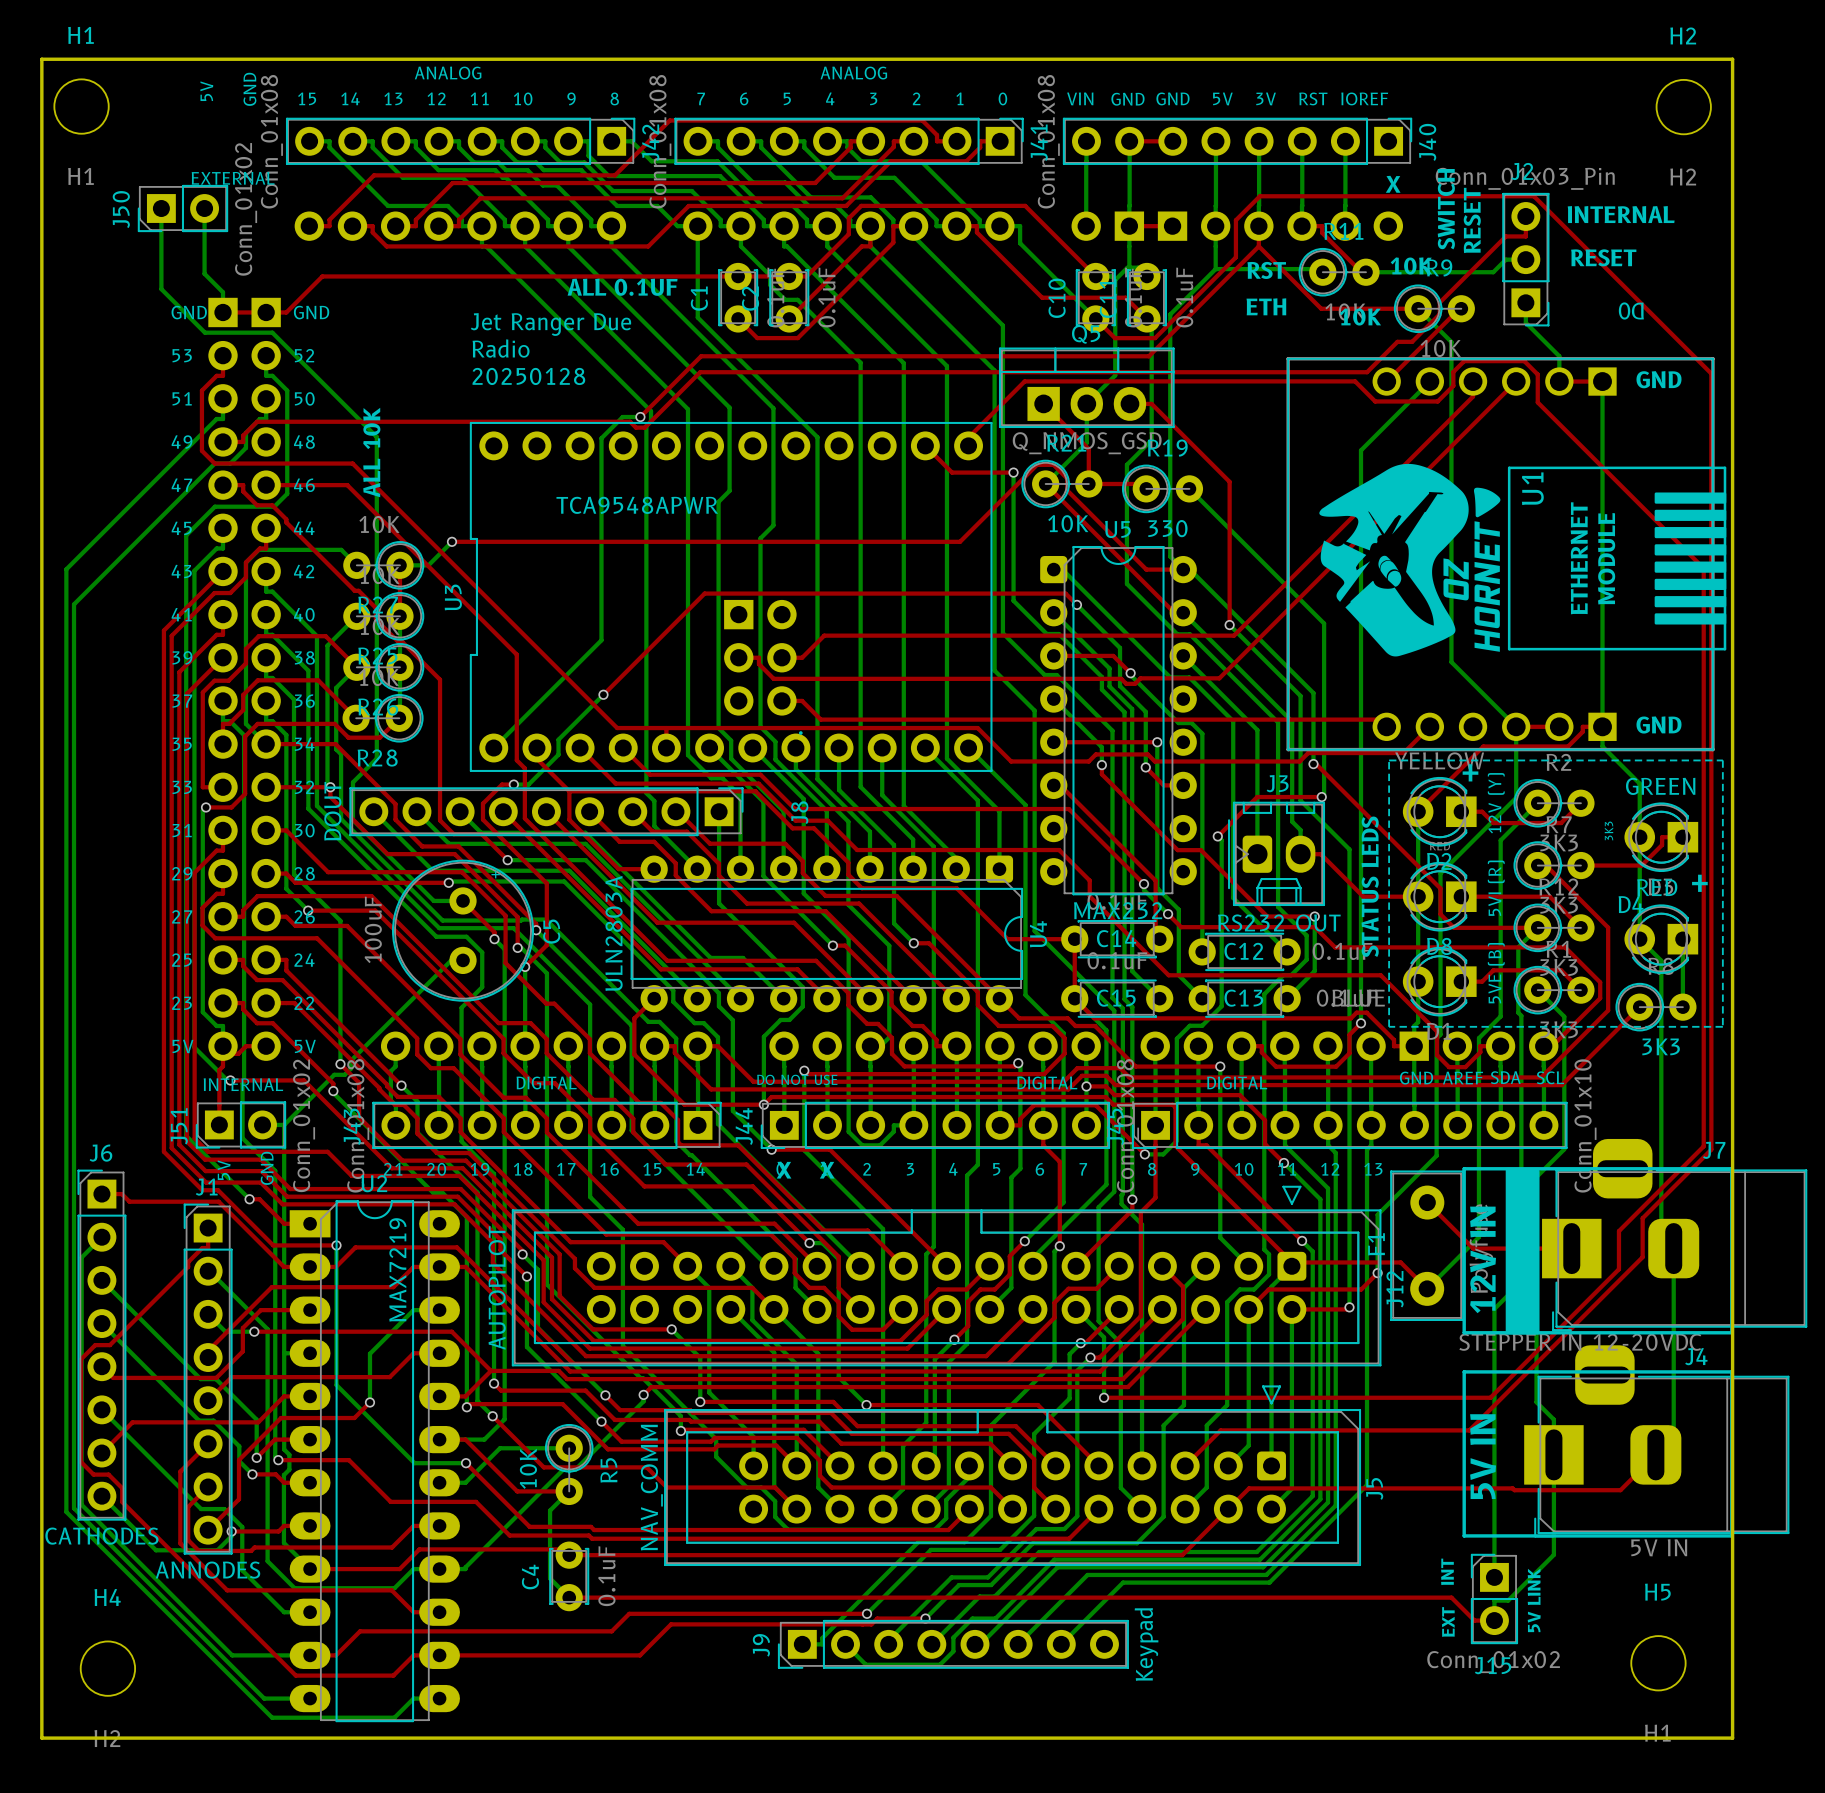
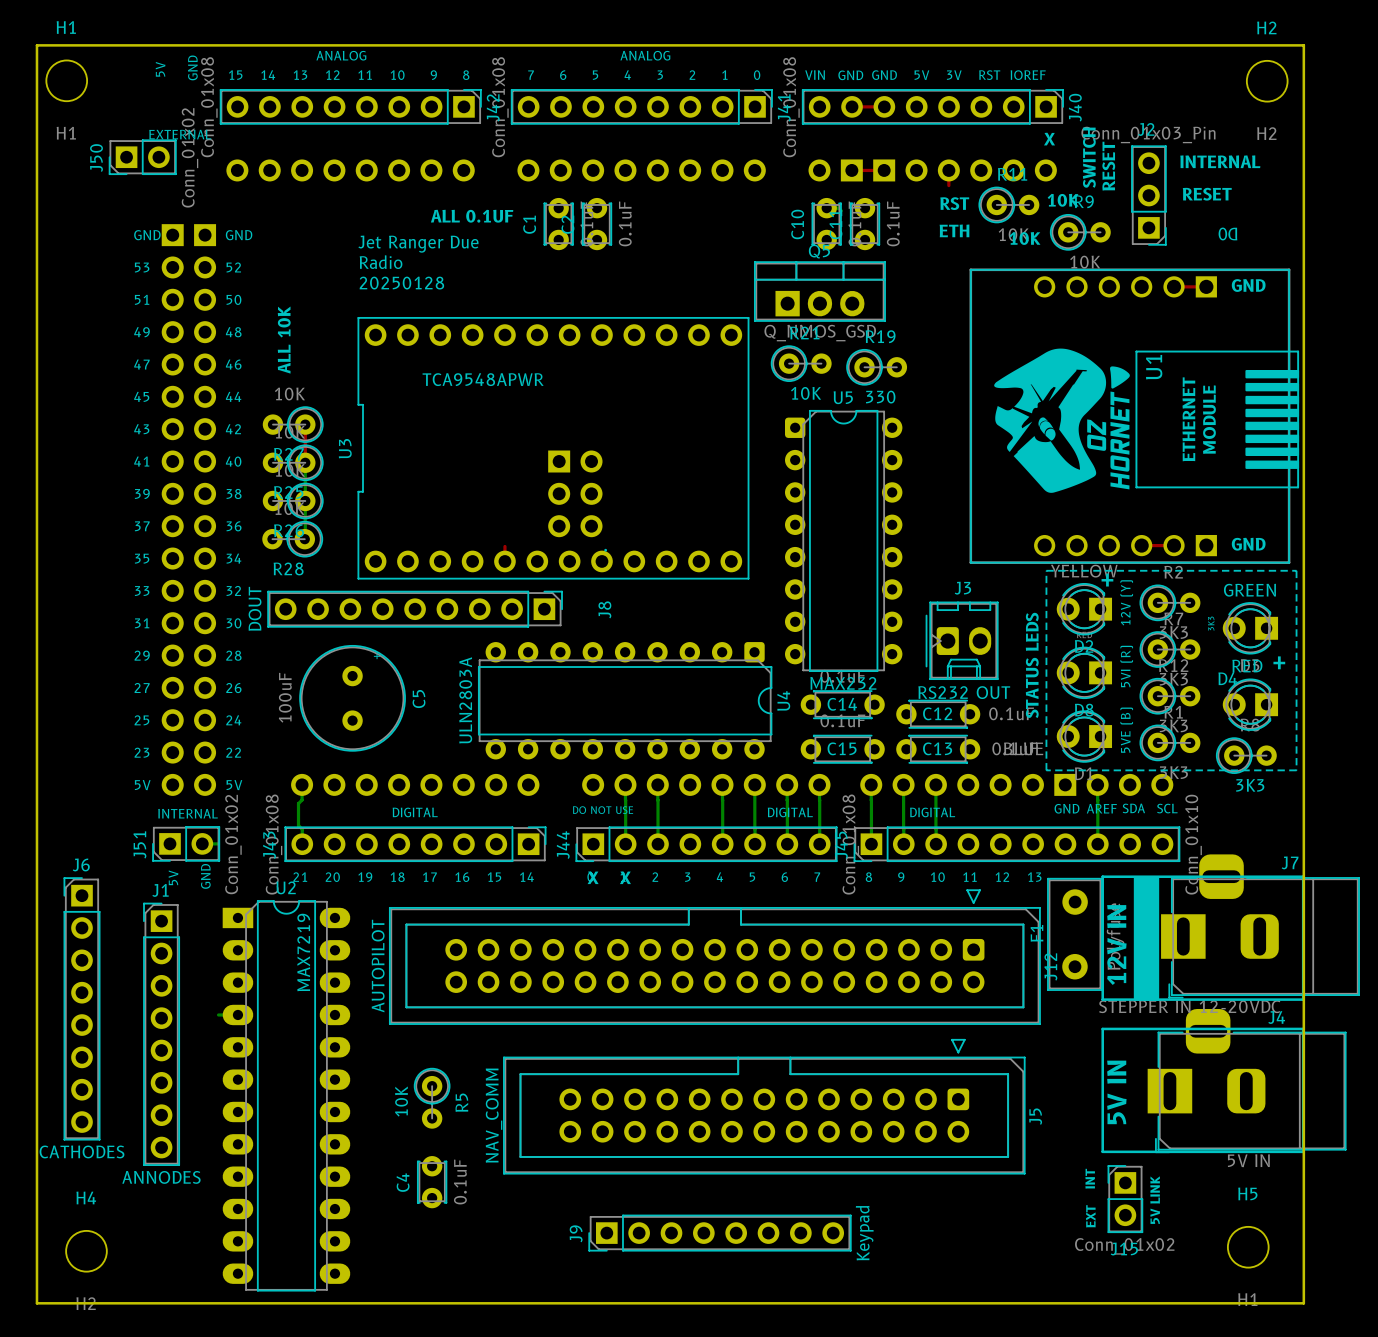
bottom track: (309, 141) (329, 141) (329, 147) (387, 205) (447, 205) (461, 219) (461, 226) (481, 226) (481, 246) (486, 246) (651, 411) (651, 421) (646, 426) (646, 793) (654, 801) (654, 826) (697, 869) -> none
bottom track: (352, 141) (372, 141) (372, 147) (403, 177) (462, 177) (504, 219) (504, 226) (525, 226) (525, 246) (688, 409) (688, 755) (711, 778) (722, 778) (740, 796) (740, 869) -> none
bottom track: (395, 141) (415, 141) (415, 147) (438, 170) (495, 170) (502, 177) (506, 177) (548, 219) (548, 226) (568, 226) (568, 246) (729, 407) (729, 490) (718, 501) (718, 728) (731, 740) (731, 758) (783, 811) (783, 869) -> none
bottom track: (439, 141) (459, 141) (459, 147) (474, 162) (498, 162) (506, 170) (527, 170) (542, 185) (556, 185) (591, 219) (591, 226) (611, 226) (611, 246) (773, 408) (773, 525) (760, 538) (760, 726) (775, 741) (775, 759) (826, 810) (826, 869) -> none
bottom track: (482, 141) (502, 141) (502, 147) (517, 162) (536, 162) (543, 170) (581, 170) (617, 205) (657, 205) (677, 226) (697, 226) (697, 317) (817, 437) (817, 779) (869, 831) (869, 869) -> none
bottom track: (525, 141) (545, 141) (545, 147) (560, 162) (584, 162) (612, 191) (691, 191) (720, 219) (720, 226) (740, 226) (740, 246) (770, 275) (770, 284) (785, 299) (797, 299) (860, 362) (860, 786) (913, 839) (913, 869) -> none
bottom track: (568, 141) (588, 141) (588, 155) (608, 176) (720, 176) (763, 219) (763, 226) (784, 226) (784, 246) (786, 246) (903, 363) (903, 805) (956, 858) (956, 869) -> none
bottom track: (611, 141) (631, 141) (651, 161) (717, 161) (762, 205) (793, 205) (807, 219) (807, 226) (827, 226) (827, 246) (946, 366) (946, 758) (999, 811) (999, 869) -> none
bottom track: (698, 141) (717, 141) (717, 147) (752, 182) (785, 182) (808, 205) (836, 205) (850, 219) (850, 226) (870, 226) (870, 246) (994, 370) (994, 670) (1034, 710) (1034, 931) (1114, 1010) (1114, 1191) (1098, 1207) (1098, 1321) (1120, 1343) (1120, 1487) (1142, 1509) -> none
bottom track: (741, 141) (761, 141) (761, 147) (810, 197) (870, 197) (893, 219) (893, 226) (913, 226) -> none
bottom track: (784, 141) (804, 141) (804, 147) (834, 177) (894, 177) (936, 219) (936, 226) (956, 226) -> none
bottom track: (827, 141) (847, 141) (847, 147) (861, 161) (921, 161) (979, 219) (979, 226) (1020, 226) (1020, 243) (1095, 318) -> none
top track: (870, 141) (850, 141) (850, 147) (815, 183) (452, 183) (415, 219) (415, 226) (395, 226) -> none
top track: (913, 141) (893, 141) (893, 146) (842, 198) (480, 198) (459, 219) (459, 226) (438, 226) -> none
top track: (956, 141) (937, 141) (937, 135) (922, 120) (669, 120) (614, 175) (374, 175) (329, 219) (329, 226) (309, 226) -> none
top track: (1000, 141) (980, 141) (980, 147) (966, 161) (890, 161) (846, 205) (688, 205) (648, 246) (386, 246) (372, 232) (372, 226) (352, 226) -> none
bottom track: (1086, 141) (1086, 226) -> none
bottom track: (1129, 141) (1129, 267) -> none
bottom track: (1215, 141) (1215, 269) -> none
bottom track: (1259, 141) (1258, 226) -> none
bottom track: (1302, 141) (1302, 226) -> none
bottom track: (1345, 141) (1345, 226) -> none
bottom track: (161, 208) (161, 289) (204, 332) (272, 332) (376, 437) (376, 758) (352, 782) (352, 820) (433, 900) (463, 900) -> none
bottom track: (204, 208) (204, 273) (223, 292) (223, 312) -> none
top track: (1525, 216) (1525, 236) (1505, 236) (1439, 302) (1439, 314) (1412, 341) (1397, 341) (1367, 372) (700, 372) (644, 427) (636, 427) (630, 421) (257, 421) (243, 435) (243, 441) (223, 441) -> none
top track: (870, 226) (870, 246) (861, 246) (789, 318) -> none
bottom track: (903, 226) (1002, 325) (1002, 633) (1044, 675) (1056, 675) (1112, 730) (1112, 998) (1122, 1008) (1121, 1204) (1142, 1224) (1142, 1465) -> none
top track: (913, 226) (893, 226) (893, 242) (797, 338) (757, 338) (738, 318) -> none
top track: (956, 226) (976, 226) (976, 232) (1042, 297) (1125, 297) (1146, 318) -> none
top track: (1302, 226) (1322, 226) (1322, 232) (1361, 272) (1365, 272) -> none
bottom track: (1525, 259) (1505, 259) (1493, 272) (1365, 272) -> none
bottom track: (1215, 269) (1170, 314) (1170, 556) (1183, 569) (1189, 569) (1313, 693) (1313, 764) -> none
bottom track: (1215, 269) (1319, 269) (1322, 272) -> none
top track: (1095, 276) (1025, 205) (861, 205) (848, 218) (848, 234) (806, 276) (322, 276) (286, 312) (223, 312) -> none
bottom track: (1146, 276) (1138, 267) (1127, 267) (1115, 279) (1115, 375) (1086, 403) (1086, 442) (1045, 483) -> none
bottom track: (1525, 302) (1525, 322) (1559, 356) (1559, 381) -> none
top track: (1418, 308) (1321, 308) (1258, 246) (1148, 356) (701, 356) (640, 417) -> none
bottom track: (1418, 308) (1451, 342) (1451, 662) (1516, 726) (1516, 797) (1440, 873) (1440, 1034) (1436, 1038) (1436, 1155) (1377, 1214) (1377, 1273) -> none
top track: (1461, 308) (1386, 381) -> none
top track: (1095, 318) (1115, 338) (1155, 338) (1235, 257) (1235, 220) (1259, 196) (1533, 196) (1711, 373) (1711, 1149) (1642, 1218) (1642, 1257) (1469, 1430) (1220, 1430) (1185, 1465) -> none
bottom track: (1146, 318) (1151, 323) (1151, 440) (1126, 464) (1126, 583) (1177, 634) (1189, 634) (1278, 722) (1278, 907) (1306, 935) (1306, 959) (1291, 975) (1283, 975) (1264, 994) (1264, 1249) (1269, 1254) (1269, 1274) (1254, 1289) (1239, 1289) (1227, 1302) (1227, 1405) (1206, 1425) (1206, 1487) (1185, 1509) -> none
top track: (223, 355) (223, 375) (216, 375) (201, 390) (201, 450) (214, 463) (352, 463) (617, 728) (977, 728) (1011, 761) (1088, 761) (1095, 754) (1147, 754) (1154, 761) (1299, 761) (1308, 753) (1403, 753) (1429, 726) -> none
bottom track: (266, 355) (266, 375) (272, 375) (287, 390) (287, 493) (274, 506) (214, 506) (186, 535) (186, 1135) (249, 1199) -> none
bottom track: (1429, 381) (1361, 450) (1361, 1023) -> none
top track: (1473, 381) (1473, 396) (1234, 635) (824, 635) (802, 657) (781, 657) -> none
top track: (1516, 381) (1219, 678) (1140, 678) (1135, 683) (1126, 683) (1121, 678) (773, 678) (758, 664) (758, 657) (738, 657) -> none
bottom track: (1602, 381) (1602, 746) (1639, 783) (1639, 939) (1661, 960) (1661, 1236) (1673, 1248) (1673, 1437) (1655, 1454) -> none
bottom track: (223, 398) (223, 419) (216, 419) (66, 569) (66, 1511) (272, 1717) (394, 1717) (413, 1698) (439, 1698) -> none
bottom track: (266, 398) (266, 419) (259, 419) (245, 432) (245, 447) (230, 463) (214, 463) (74, 604) (74, 1508) (264, 1698) (310, 1698) -> none
top track: (1043, 403) (1088, 449) (1088, 483) (1141, 483) (1146, 488) -> none
top track: (1129, 403) (1151, 403) (1229, 481) (1229, 625) -> none
bottom track: (640, 417) (622, 417) (601, 438) (601, 640) (493, 748) -> none
via: (640, 417) -> none
top track: (925, 445) (952, 472) (1013, 472) -> none
top track: (968, 445) (968, 437) (1024, 381) (1355, 381) (1375, 401) (1437, 401) (1453, 385) (1453, 372) (1464, 361) (1524, 361) (1537, 374) (1537, 402) (1703, 568) (1703, 1146) (1618, 1231) (1618, 1269) (1490, 1397) (1104, 1397) -> none
bottom track: (1013, 472) (1013, 600) (1046, 634) (1058, 634) (1101, 676) (1101, 689) (1124, 712) (1124, 999) (1132, 1007) (1132, 1199) -> none
via: (1013, 472) -> none
top track: (1045, 483) (1174, 612) (1183, 612) -> none
top track: (223, 485) (243, 485) (243, 491) (257, 505) (272, 505) (286, 519) (286, 522) (354, 590) (358, 590) (375, 608) (375, 619) (398, 641) (402, 641) (440, 679) (440, 820) (453, 834) (481, 834) (507, 860) -> none
top track: (266, 485) (347, 485) (516, 654) (516, 760) (524, 768) (524, 818) (667, 960) (816, 960) (848, 993) (848, 1005) (867, 1023) (877, 1023) (891, 1037) (891, 1053) (904, 1066) (1015, 1066) (1018, 1063) -> none
bottom track: (1189, 488) (1324, 623) (1324, 794) (1321, 797) -> none
bottom track: (223, 528) (223, 548) (216, 548) (194, 570) (194, 1047) (227, 1080) (230, 1080) -> none
top track: (266, 528) (266, 548) (259, 548) (245, 562) (245, 577) (230, 593) (214, 593) (171, 635) (171, 1148) (206, 1182) (260, 1182) (282, 1204) (454, 1204) (492, 1242) (492, 1262) (586, 1356) (986, 1356) (1032, 1309) -> none
top track: (452, 541) (960, 541) (1037, 464) (1053, 464) (1067, 478) (1067, 490) (1146, 569) (1183, 569) -> none
bottom track: (452, 541) (428, 565) (399, 565) -> none
via: (452, 541) -> none
bottom track: (356, 565) (341, 549) (258, 549) (245, 562) (245, 723) (266, 744) -> none
bottom track: (1053, 569) (1062, 569) (1170, 677) (1189, 677) (1233, 721) (1233, 897) (1287, 951) -> none
top track: (223, 571) (163, 630) (163, 1151) (202, 1190) (218, 1190) (273, 1245) (336, 1245) -> none
bottom track: (266, 571) (266, 591) (272, 591) (316, 636) (316, 805) (439, 928) (513, 928) (590, 1004) (590, 1196) (622, 1229) (622, 1345) (716, 1439) (716, 1456) (746, 1487) (761, 1487) (775, 1501) (775, 1516) (787, 1529) (934, 1529) (946, 1518) (946, 1500) (969, 1476) (969, 1465) -> none
top track: (1076, 604) (1065, 593) (704, 593) (603, 694) -> none
bottom track: (1076, 604) (1120, 647) (1120, 686) (1145, 711) (1145, 767) -> none
via: (1076, 604) -> none
bottom track: (1053, 612) (1109, 668) (1109, 686) (1132, 709) (1132, 971) (1159, 998) -> none
bottom track: (1183, 612) (1292, 721) (1292, 821) (1300, 830) (1300, 854) -> none
top track: (223, 614) (223, 634) (216, 634) (179, 672) (179, 1144) (205, 1171) (261, 1171) (287, 1196) (457, 1196) (500, 1239) (500, 1250) (526, 1276) -> none
bottom track: (266, 614) (266, 634) (272, 634) (308, 670) (308, 808) (436, 936) (466, 936) (482, 952) (482, 987) (461, 1007) (461, 1141) (494, 1173) (494, 1383) -> none
bottom track: (356, 616) (327, 645) (327, 784) (330, 787) -> none
bottom track: (1229, 625) (1300, 695) (1300, 800) (1349, 849) (1349, 1307) -> none
via: (1229, 625) -> none
top track: (1053, 655) (1113, 655) (1130, 673) -> none
bottom track: (1183, 655) (1257, 730) (1257, 854) -> none
top track: (223, 657) (186, 693) (186, 1141) (205, 1159) (260, 1159) (290, 1189) (460, 1189) (522, 1250) (522, 1254) -> none
bottom track: (266, 657) (266, 677) (272, 677) (294, 699) (294, 874) (340, 920) (340, 1064) -> none
top track: (356, 667) (325, 636) (258, 636) (245, 649) (245, 663) (228, 680) (214, 680) (202, 692) (202, 787) (223, 787) -> none
bottom track: (356, 667) (336, 687) (336, 749) (341, 754) (341, 818) (442, 920) (546, 919) (648, 1021) (659, 1021) (676, 1038) (676, 1141) (795, 1258) (795, 1287) (817, 1309) -> none
bottom track: (1130, 673) (1178, 723) (1191, 723) (1202, 733) (1202, 951) -> none
via: (1130, 673) -> none
bottom track: (603, 694) (558, 739) (558, 754) (528, 784) (513, 784) -> none
via: (603, 694) -> none
bottom track: (1053, 699) (1101, 747) (1101, 765) -> none
bottom track: (223, 700) (223, 721) (230, 721) (244, 735) (242, 1138) (275, 1170) (275, 1457) (278, 1460) -> none
bottom track: (266, 700) (266, 721) (272, 721) (286, 735) (286, 888) (308, 910) -> none
top track: (781, 700) (802, 700) (820, 719) (1379, 719) (1386, 726) -> none
top track: (356, 718) (318, 680) (257, 680) (243, 694) (243, 710) (229, 723) (223, 723) (223, 744) -> none
top track: (399, 718) (379, 737) (348, 737) (334, 723) (257, 723) (245, 736) (245, 793) (231, 807) (206, 807) -> none
top track: (1602, 726) (1582, 726) (1582, 731) (1568, 746) (1483, 746) (1418, 811) -> none
top track: (1053, 742) (1157, 742) -> none
bottom track: (1157, 742) (1157, 888) (1178, 909) (1178, 975) (1202, 998) -> none
via: (1157, 742) -> none
top track: (266, 744) (335, 744) (395, 804) (395, 819) (422, 846) (458, 846) (536, 924) (536, 930) -> none
top track: (536, 748) (536, 758) (569, 791) -> none
top track: (580, 748) (615, 783) (758, 783) (795, 820) (827, 820) (857, 850) (1059, 850) (1089, 880) (1089, 896) (1168, 975) (1380, 975) (1437, 1031) (1437, 1055) (1449, 1067) (1465, 1067) (1480, 1052) (1480, 1046) (1500, 1046) -> none
top track: (623, 748) (649, 774) (760, 774) (794, 809) (1068, 809) (1144, 884) -> none
bottom track: (709, 748) (763, 801) (763, 876) (832, 945) -> none
bottom track: (752, 748) (803, 799) (803, 893) (848, 938) (848, 1131) (862, 1145) (880, 1145) (893, 1131) (893, 1125) (913, 1125) (913, 1046) -> none
bottom track: (795, 748) (795, 769) (848, 821) (848, 904) (889, 945) (889, 1037) (870, 1056) -> none
bottom track: (839, 748) (839, 790) (894, 845) (894, 923) (913, 943) -> none
bottom track: (882, 748) (882, 795) (933, 846) (933, 1246) (926, 1254) (926, 1422) (903, 1445) (903, 1489) (883, 1509) -> none
bottom track: (925, 748) (977, 800) (977, 1164) (967, 1175) (967, 1343) (948, 1362) (948, 1486) (926, 1509) -> none
bottom track: (968, 748) (1025, 804) (1025, 995) (1063, 1033) (1063, 1202) (1024, 1241) -> none
top track: (1313, 764) (1316, 764) (1440, 888) (1440, 914) (1454, 927) (1537, 927) -> none
via: (1313, 764) -> none
top track: (1101, 765) (1101, 774) (1177, 850) (1200, 850) (1267, 916) (1314, 916) -> none
via: (1101, 765) -> none
top track: (1145, 767) (1163, 785) (1183, 785) -> none
via: (1145, 767) -> none
top track: (513, 784) (502, 784) (482, 803) (482, 819) (546, 883) (546, 945) (525, 966) -> none
via: (513, 784) -> none
top track: (1053, 785) (1060, 785) (1155, 880) (1155, 935) (1159, 939) -> none
top track: (266, 787) (330, 787) (330, 796) (387, 854) (454, 854) (517, 917) (517, 947) -> none
via: (330, 787) -> none
top track: (569, 791) (755, 791) (792, 828) (814, 828) (848, 862) (848, 874) (861, 888) (956, 888) (1007, 939) (1074, 939) (1074, 998) (1094, 1018) (1350, 1018) (1356, 1012) (1366, 1012) (1394, 1039) (1394, 1046) (1414, 1046) -> none
top track: (569, 791) (569, 819) (618, 869) (654, 869) -> none
top track: (1321, 797) (1257, 797) (1217, 836) -> none
via: (1321, 797) -> none
bottom track: (1537, 803) (1500, 840) (1500, 1016) (1478, 1038) (1478, 1237) (1427, 1288) -> none
top track: (1580, 803) (1561, 823) (1493, 823) (1482, 811) (1461, 811) -> none
bottom track: (206, 807) (202, 810) (202, 1012) (216, 1026) (223, 1026) (223, 1046) -> none
via: (206, 807) -> none
bottom track: (373, 811) (432, 870) (569, 870) (697, 998) -> none
bottom track: (416, 811) (449, 843) (585, 843) (740, 998) -> none
bottom track: (460, 811) (481, 832) (585, 832) (710, 957) (742, 957) (783, 998) -> none
top track: (503, 811) (660, 969) (797, 969) (826, 998) -> none
top track: (546, 811) (657, 922) (794, 922) (869, 998) -> none
top track: (589, 811) (619, 841) (654, 841) (675, 863) (675, 875) (711, 911) (825, 911) (913, 998) -> none
top track: (632, 811) (652, 831) (686, 831) (718, 863) (718, 875) (747, 903) (859, 903) (956, 998) -> none
top track: (675, 811) (709, 843) (785, 843) (802, 861) (802, 873) (825, 895) (896, 895) (1019, 1018) (1067, 1018) (1075, 1026) (1095, 1026) (1135, 1066) (1220, 1066) -> none
bottom track: (719, 811) (719, 903) (802, 987) (802, 1006) (789, 1019) (780, 1019) (763, 1036) (763, 1104) -> none
bottom track: (1418, 811) (1418, 1022) (1414, 1026) (1414, 1125) -> none
top track: (223, 830) (223, 850) (216, 850) (194, 872) (194, 1138) (208, 1151) (327, 1151) (351, 1175) (459, 1175) (543, 1260) (543, 1302) (589, 1348) (907, 1348) (946, 1309) -> none
top track: (266, 830) (286, 830) (328, 872) (462, 872) (505, 915) (505, 963) (546, 1003) (554, 1003) (589, 1039) (589, 1053) (639, 1102) (660, 1102) (678, 1120) (678, 1142) (681, 1145) (738, 1145) (823, 1230) (867, 1230) (903, 1266) -> none
bottom track: (1217, 836) (1221, 840) (1221, 1006) (1202, 1025) (1189, 1025) (1176, 1038) (1176, 1140) (1163, 1154) (1144, 1154) -> none
via: (1217, 836) -> none
top track: (1682, 837) (1662, 837) (1662, 845) (1641, 865) (1580, 865) -> none
top track: (1300, 854) (1320, 854) (1363, 896) (1418, 896) -> none
bottom track: (507, 860) (585, 860) (718, 993) (718, 1006) (732, 1020) (732, 1110) (771, 1149) -> none
via: (507, 860) -> none
top track: (1537, 865) (1546, 865) (1608, 927) (1608, 1010) (1541, 1077) (1129, 1077) (1120, 1068) (1077, 1068) (1063, 1081) (753, 1081) (717, 1046) (697, 1046) -> none
top track: (223, 873) (223, 893) (216, 893) (202, 907) (202, 925) (215, 938) (317, 938) (417, 1038) (417, 1054) (430, 1068) (453, 1068) (503, 1118) (503, 1132) (606, 1234) (770, 1234) (794, 1258) (794, 1273) (809, 1287) (824, 1287) (838, 1302) (838, 1316) (852, 1329) (883, 1329) (903, 1309) -> none
top track: (266, 873) (286, 873) (295, 882) (448, 882) -> none
bottom track: (448, 882) (564, 881) (673, 990) (673, 1001) (694, 1023) (703, 1023) (717, 1037) (717, 1123) (860, 1266) -> none
via: (448, 882) -> none
bottom track: (1144, 884) (1144, 890) (1168, 914) -> none
via: (1144, 884) -> none
top track: (1461, 896) (1549, 896) (1580, 927) -> none
top track: (463, 900) (494, 932) (494, 939) -> none
top track: (308, 910) (375, 910) (503, 1038) (503, 1053) (533, 1083) (554, 1083) (590, 1118) (590, 1132) (644, 1186) (752, 1186) (809, 1243) -> none
via: (308, 910) -> none
top track: (1168, 914) (1181, 927) (1314, 927) (1335, 947) (1565, 947) (1600, 982) (1600, 998) (1552, 1046) (1543, 1046) -> none
via: (1168, 914) -> none
top track: (223, 916) (243, 916) (243, 910) (257, 896) (371, 896) (498, 1023) (530, 1023) (546, 1039) (546, 1053) (593, 1099) (614, 1099) (633, 1118) (633, 1132) (665, 1164) (746, 1164) (838, 1256) (838, 1287) (860, 1309) -> none
top track: (266, 916) (286, 916) (295, 925) (347, 925) (460, 1039) (460, 1054) (503, 1097) (526, 1097) (546, 1118) (546, 1132) (638, 1223) (774, 1223) (817, 1266) -> none
bottom track: (1314, 916) (1314, 971) (1287, 998) -> none
via: (1314, 916) -> none
bottom track: (1537, 927) (1518, 947) (1518, 1012) (1521, 1015) (1521, 1282) (1494, 1308) (1494, 1577) -> none
bottom track: (536, 930) (631, 1025) (631, 1130) (767, 1266) (773, 1266) -> none
via: (536, 930) -> none
bottom track: (494, 939) (504, 949) (504, 1419) (484, 1439) (439, 1439) -> none
via: (494, 939) -> none
bottom track: (1682, 939) (1682, 1007) -> none
top track: (913, 943) (928, 943) (977, 992) (977, 1005) (998, 1026) (1052, 1026) (1064, 1038) (1064, 1053) (1044, 1074) (807, 1074) (804, 1070) -> none
via: (913, 943) -> none
top track: (832, 945) (845, 945) (891, 992) (891, 1004) (912, 1026) (922, 1026) (936, 1039) (936, 1046) (956, 1046) -> none
via: (832, 945) -> none
bottom track: (517, 947) (521, 947) (546, 973) (546, 1284) (680, 1416) (680, 1430) -> none
via: (517, 947) -> none
top track: (223, 959) (243, 959) (243, 966) (257, 980) (282, 980) (397, 1096) (438, 1096) (460, 1118) (460, 1132) (570, 1242) (663, 1242) (687, 1266) -> none
top track: (266, 959) (286, 959) (286, 970) (401, 1085) -> none
bottom track: (463, 960) (451, 960) (351, 1060) (351, 1068) (344, 1074) (334, 1074) (284, 1124) (284, 1449) (289, 1454) (289, 1469) (283, 1475) (283, 1542) (310, 1569) -> none
bottom track: (525, 966) (525, 1125) -> none
via: (525, 966) -> none
top track: (1461, 981) (1482, 981) (1493, 970) (1561, 970) (1580, 990) -> none
bottom track: (1537, 990) (1564, 1016) (1564, 1149) (1536, 1177) (1536, 1402) (1553, 1419) (1553, 1554) (1508, 1600) (1494, 1600) (1494, 1620) -> none
top track: (654, 998) (634, 1018) (634, 1054) (684, 1104) (763, 1104) (771, 1097) (1105, 1097) (1113, 1104) (1172, 1104) (1175, 1107) (1175, 1146) (1291, 1262) -> none
bottom track: (1074, 998) (1106, 1030) (1106, 1184) (1032, 1258) (1032, 1266) -> none
top track: (223, 1003) (243, 1003) (243, 1009) (257, 1023) (272, 1023) (333, 1083) (333, 1091) -> none
top track: (266, 1003) (294, 1003) (395, 1104) (403, 1104) (417, 1118) (417, 1133) (436, 1153) (469, 1153) (574, 1258) (574, 1268) (594, 1287) (752, 1287) (773, 1309) -> none
top track: (1639, 1007) (1561, 1085) (1115, 1085) (1106, 1075) (1082, 1075) (1068, 1089) (711, 1089) (674, 1053) (674, 1046) (654, 1046) -> none
top track: (1361, 1023) (1349, 1034) (1349, 1053) (1336, 1066) (1275, 1066) (1261, 1052) (1261, 1046) (1241, 1046) -> none
via: (1361, 1023) -> none
top track: (223, 1046) (223, 1066) (219, 1070) (219, 1124) -> none
top track: (266, 1046) (245, 1046) (238, 1053) (223, 1053) -> none
bottom track: (438, 1046) (439, 1125) -> none
bottom track: (481, 1046) (482, 1125) -> none
bottom track: (568, 1046) (568, 1125) -> none
bottom track: (611, 1046) (611, 1125) -> none
bottom track: (654, 1046) (654, 1125) -> none
bottom track: (697, 1046) (698, 1125) -> none
bottom track: (784, 1046) (784, 1125) -> none
bottom track: (1284, 1046) (1285, 1145) (1328, 1188) (1328, 1502) (1263, 1567) (1057, 1567) (980, 1644) (975, 1644) -> none
bottom track: (1327, 1046) (1328, 1145) (1335, 1152) (1335, 1505) (1266, 1574) (1087, 1574) (1018, 1644) -> none
bottom track: (1371, 1046) (1371, 1145) (1367, 1149) (1367, 1485) (1269, 1582) (1123, 1582) (1061, 1644) -> none
bottom track: (1500, 1046) (1500, 1125) -> none
bottom track: (1543, 1046) (1543, 1125) -> none
bottom track: (1018, 1063) (1020, 1065) (1020, 1168) (1011, 1177) (1011, 1287) (989, 1309) -> none
via: (1018, 1063) -> none
top track: (340, 1064) (359, 1082) (359, 1117) (402, 1160) (465, 1160) (559, 1254) (559, 1296) (593, 1329) (671, 1329) -> none
via: (340, 1064) -> none
bottom track: (1220, 1066) (1220, 1237) (1248, 1266) -> none
via: (1220, 1066) -> none
bottom track: (804, 1070) (804, 1150) (883, 1229) (883, 1465) -> none
via: (804, 1070) -> none
top track: (230, 1080) (303, 1080) (391, 1168) (462, 1168) (552, 1257) (552, 1299) (593, 1340) (900, 1340) (926, 1314) (926, 1301) (938, 1289) (966, 1289) (989, 1266) -> none
via: (230, 1080) -> none
bottom track: (401, 1085) (417, 1101) (417, 1132) (477, 1192) (477, 1401) (492, 1416) -> none
via: (401, 1085) -> none
top track: (1086, 1086) (1105, 1086) (1114, 1095) (1239, 1095) (1265, 1120) (1265, 1144) (1284, 1163) -> none
via: (1086, 1086) -> none
bottom track: (333, 1091) (433, 1193) (442, 1193) (466, 1217) (466, 1407) -> none
via: (333, 1091) -> none
via: (763, 1104) -> none
top track: (1000, 1125) (1020, 1125) (1020, 1119) (1033, 1105) (1095, 1105) (1144, 1154) -> none
top track: (1043, 1125) (1043, 1145) (1059, 1161) (1059, 1246) -> none
top track: (1155, 1125) (1155, 1197) (1140, 1212) (1140, 1316) (1099, 1357) (1090, 1357) -> none
top track: (1198, 1125) (1198, 1145) (1206, 1145) (1302, 1240) -> none
top track: (771, 1149) (830, 1149) (946, 1266) -> none
via: (771, 1149) -> none
via: (1144, 1154) -> none
bottom track: (1284, 1163) (1320, 1199) (1320, 1499) (1260, 1559) (1054, 1559) (995, 1618) (972, 1618) (953, 1637) (953, 1651) (940, 1664) (865, 1664) (845, 1644) -> none
via: (1284, 1163) -> none
top track: (101, 1194) (121, 1194) (129, 1201) (218, 1201) (284, 1266) (336, 1266) (355, 1247) (457, 1247) (573, 1363) (1008, 1363) (1054, 1317) (1054, 1302) (1068, 1288) (1096, 1288) (1119, 1266) -> none
top track: (249, 1199) (259, 1199) (284, 1223) (310, 1223) -> none
via: (249, 1199) -> none
top track: (1132, 1199) (1132, 1210) (1076, 1266) -> none
via: (1132, 1199) -> none
top track: (1427, 1202) (1473, 1248) (1571, 1248) -> none
top track: (208, 1228) (208, 1248) (202, 1248) (188, 1262) (188, 1266) (109, 1345) (95, 1345) (81, 1359) (81, 1461) (93, 1474) (108, 1474) (122, 1488) (122, 1502) (295, 1675) (393, 1675) (413, 1655) (640, 1655) (671, 1624) (862, 1624) -> none
bottom track: (101, 1237) (81, 1257) (81, 1504) (232, 1655) (310, 1655) -> none
bottom track: (1302, 1240) (1312, 1251) (1312, 1496) (1256, 1552) (1039, 1552) (994, 1596) (979, 1596) (931, 1644) -> none
via: (1302, 1240) -> none
top track: (1024, 1241) (1009, 1256) (1009, 1274) (994, 1289) (980, 1289) (968, 1301) (968, 1325) (954, 1339) -> none
via: (1024, 1241) -> none
bottom track: (809, 1243) (822, 1243) (838, 1259) (838, 1377) (866, 1405) -> none
via: (809, 1243) -> none
bottom track: (336, 1245) (336, 1385) (414, 1463) (466, 1463) -> none
via: (336, 1245) -> none
bottom track: (1059, 1246) (1054, 1251) (1054, 1361) (990, 1425) (990, 1515) (964, 1542) (918, 1542) (822, 1638) (822, 1644) (802, 1644) -> none
via: (1059, 1246) -> none
bottom track: (522, 1254) (537, 1269) (537, 1327) (605, 1395) -> none
via: (522, 1254) -> none
top track: (1291, 1262) (1400, 1262) (1427, 1288) -> none
bottom track: (687, 1266) (709, 1287) (709, 1392) (753, 1436) (753, 1465) -> none
bottom track: (730, 1266) (752, 1287) (752, 1320) (796, 1364) (796, 1465) -> none
top track: (1162, 1266) (1183, 1286) (1183, 1318) (1122, 1379) (567, 1379) (558, 1370) (491, 1370) -> none
bottom track: (1205, 1266) (1184, 1287) (1184, 1405) (1163, 1425) (1163, 1516) (1137, 1543) (1032, 1543) (991, 1585) (958, 1585) (925, 1618) -> none
bottom track: (1291, 1266) (1271, 1286) (1271, 1465) -> none
bottom track: (208, 1271) (267, 1329) (267, 1561) (294, 1588) (394, 1588) (413, 1569) (465, 1569) (563, 1469) (575, 1469) (643, 1401) (643, 1394) -> none
top track: (1377, 1273) (1361, 1289) (1268, 1289) (1248, 1309) -> none
via: (1377, 1273) -> none
bottom track: (526, 1276) (526, 1346) (601, 1421) -> none
via: (526, 1276) -> none
bottom track: (101, 1280) (200, 1379) (216, 1379) (256, 1419) (256, 1457) -> none
top track: (1349, 1307) (1347, 1309) (1291, 1309) -> none
via: (1349, 1307) -> none
bottom track: (730, 1309) (774, 1352) (774, 1486) (796, 1509) -> none
bottom track: (773, 1309) (818, 1353) (818, 1487) (839, 1509) -> none
bottom track: (1076, 1309) (1104, 1337) (1104, 1397) -> none
top track: (1119, 1309) (1085, 1343) (1080, 1343) -> none
top track: (1162, 1309) (1100, 1371) (570, 1371) (465, 1266) (413, 1266) (393, 1287) (271, 1287) (208, 1350) (208, 1357) -> none
top track: (1205, 1309) (1127, 1387) (651, 1387) (643, 1394) -> none
bottom track: (1248, 1309) (1248, 1445) (1228, 1465) -> none
bottom track: (1291, 1309) (1291, 1488) (1271, 1509) -> none
top track: (310, 1310) (260, 1310) (242, 1328) (242, 1351) (216, 1377) (113, 1377) (101, 1366) -> none
bottom track: (439, 1310) (413, 1310) (369, 1353) (369, 1402) -> none
bottom track: (208, 1314) (225, 1331) (254, 1331) -> none
bottom track: (101, 1323) (199, 1420) (213, 1420) (239, 1446) (239, 1461) (252, 1474) -> none
bottom track: (671, 1329) (700, 1357) (700, 1401) -> none
via: (671, 1329) -> none
top track: (254, 1331) (451, 1331) (491, 1370) -> none
via: (254, 1331) -> none
bottom track: (954, 1339) (934, 1359) (934, 1457) (926, 1465) -> none
via: (954, 1339) -> none
bottom track: (1080, 1343) (1069, 1354) (1069, 1398) (1034, 1433) (1034, 1515) (1000, 1549) (930, 1549) (867, 1613) -> none
via: (1080, 1343) -> none
top track: (439, 1353) (413, 1353) (389, 1377) (231, 1377) (208, 1400) -> none
bottom track: (1090, 1357) (1077, 1370) (1077, 1516) (1064, 1529) (1036, 1529) (987, 1577) (951, 1577) (888, 1640) (888, 1644) -> none
via: (1090, 1357) -> none
top track: (491, 1370) (465, 1396) (439, 1396) -> none
top track: (494, 1383) (501, 1390) (585, 1390) (614, 1419) (819, 1421) (841, 1443) (990, 1443) (1012, 1465) -> none
via: (494, 1383) -> none
via: (643, 1394) -> none
top track: (605, 1395) (620, 1410) (690, 1410) (693, 1412) (831, 1412) (851, 1433) (1008, 1433) (1034, 1459) (1034, 1487) (1055, 1509) -> none
via: (605, 1395) -> none
top track: (310, 1396) (284, 1396) (258, 1422) (132, 1422) (101, 1453) -> none
via: (1104, 1397) -> none
top track: (700, 1401) (833, 1401) (857, 1426) (1015, 1426) (1055, 1465) -> none
via: (700, 1401) -> none
top track: (369, 1402) (354, 1418) (281, 1418) (239, 1460) (239, 1499) (208, 1530) -> none
via: (369, 1402) -> none
top track: (866, 1405) (1037, 1405) (1098, 1465) -> none
via: (866, 1405) -> none
top track: (466, 1407) (470, 1404) (562, 1404) (607, 1449) (714, 1449) (718, 1445) (776, 1445) (796, 1465) -> none
via: (466, 1407) -> none
bottom track: (101, 1409) (201, 1509) (224, 1509) (242, 1527) (242, 1570) (284, 1612) (310, 1612) -> none
top track: (492, 1416) (543, 1467) (646, 1467) (666, 1487) (775, 1487) (796, 1509) -> none
via: (492, 1416) -> none
top track: (601, 1421) (621, 1441) (711, 1441) (714, 1437) (797, 1437) (819, 1460) (819, 1475) (831, 1487) (990, 1487) (1012, 1509) -> none
via: (601, 1421) -> none
top track: (680, 1430) (803, 1429) (839, 1465) -> none
via: (680, 1430) -> none
top track: (310, 1439) (274, 1439) (256, 1457) -> none
top track: (439, 1439) (465, 1439) (517, 1491) (569, 1491) -> none
top track: (208, 1443) (180, 1471) (180, 1543) (227, 1590) (391, 1590) (413, 1612) (439, 1612) -> none
bottom track: (569, 1448) (499, 1448) (465, 1482) (439, 1482) -> none
top track: (1655, 1454) (1620, 1490) (1249, 1488) (1182, 1555) (569, 1555) (563, 1549) (419, 1549) (399, 1569) (310, 1569) -> none
via: (256, 1457) -> none
top track: (278, 1460) (349, 1460) (390, 1501) (476, 1501) (509, 1535) (588, 1535) (592, 1538) (1069, 1538) (1098, 1509) -> none
via: (278, 1460) -> none
top track: (466, 1463) (529, 1526) (590, 1526) (594, 1530) (948, 1530) (969, 1509) -> none
via: (466, 1463) -> none
top track: (252, 1474) (275, 1474) (284, 1482) (310, 1482) -> none
via: (252, 1474) -> none
top track: (208, 1487) (188, 1506) (188, 1540) (198, 1550) (251, 1550) (254, 1547) (392, 1547) (413, 1525) (439, 1525) -> none
bottom track: (569, 1491) (550, 1510) (550, 1578) (569, 1597) -> none
bottom track: (101, 1496) (156, 1550) (217, 1550) (231, 1536) (231, 1531) -> none
top track: (310, 1525) (284, 1525) (278, 1531) (231, 1531) -> none
via: (231, 1531) -> none
top track: (569, 1597) (1451, 1597) (1474, 1620) (1494, 1620) -> none
top track: (867, 1613) (629, 1613) (611, 1631) (360, 1631) (336, 1655) (310, 1655) -> none
via: (867, 1613) -> none
top track: (925, 1618) (877, 1618) (871, 1624) (862, 1624) -> none
via: (925, 1618) -> none

